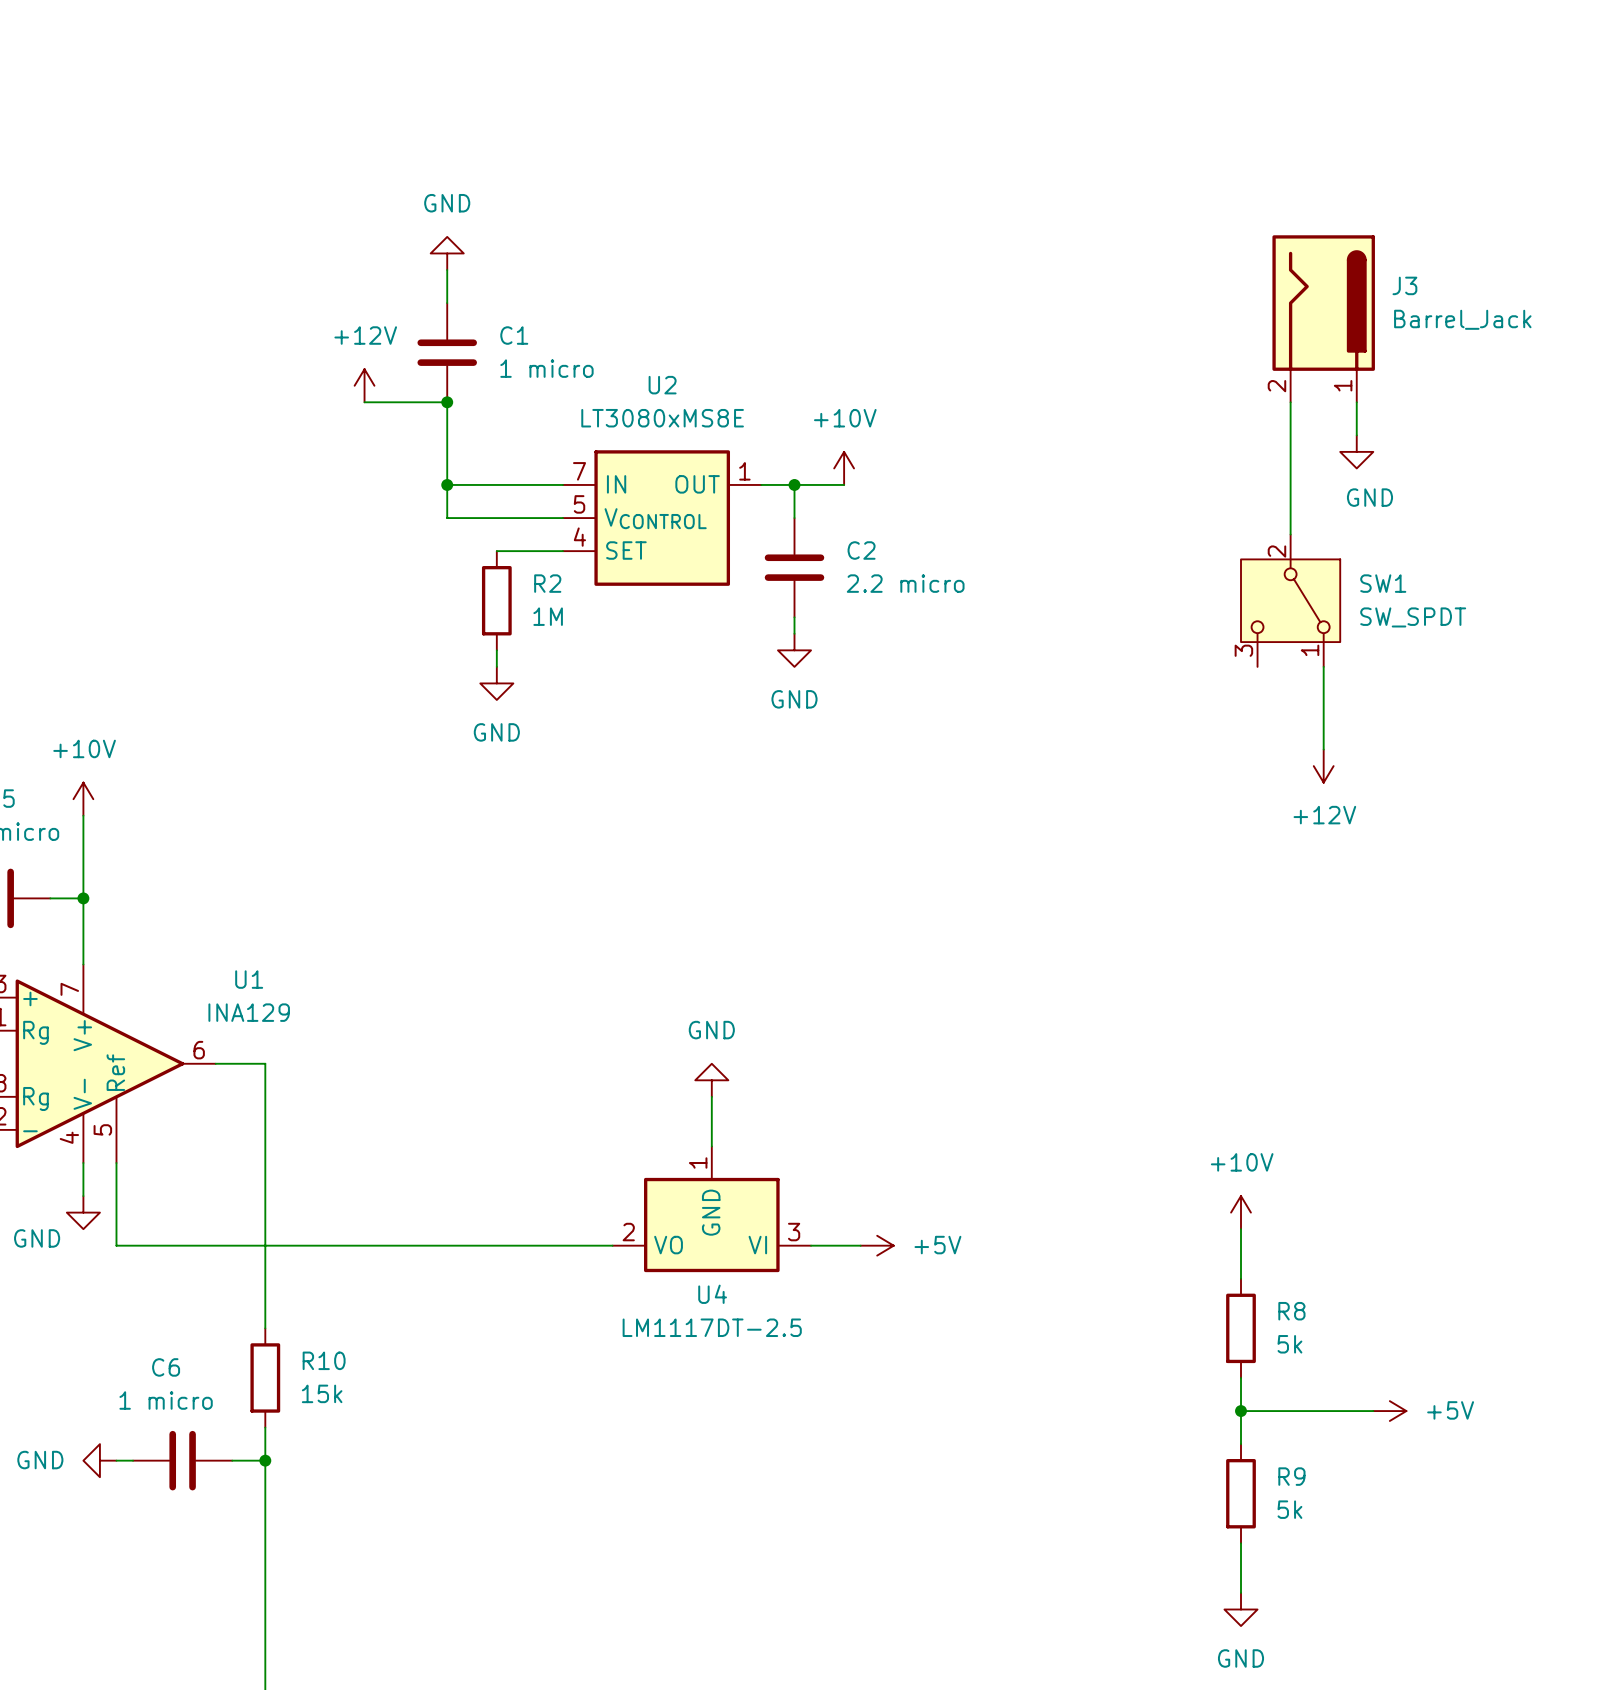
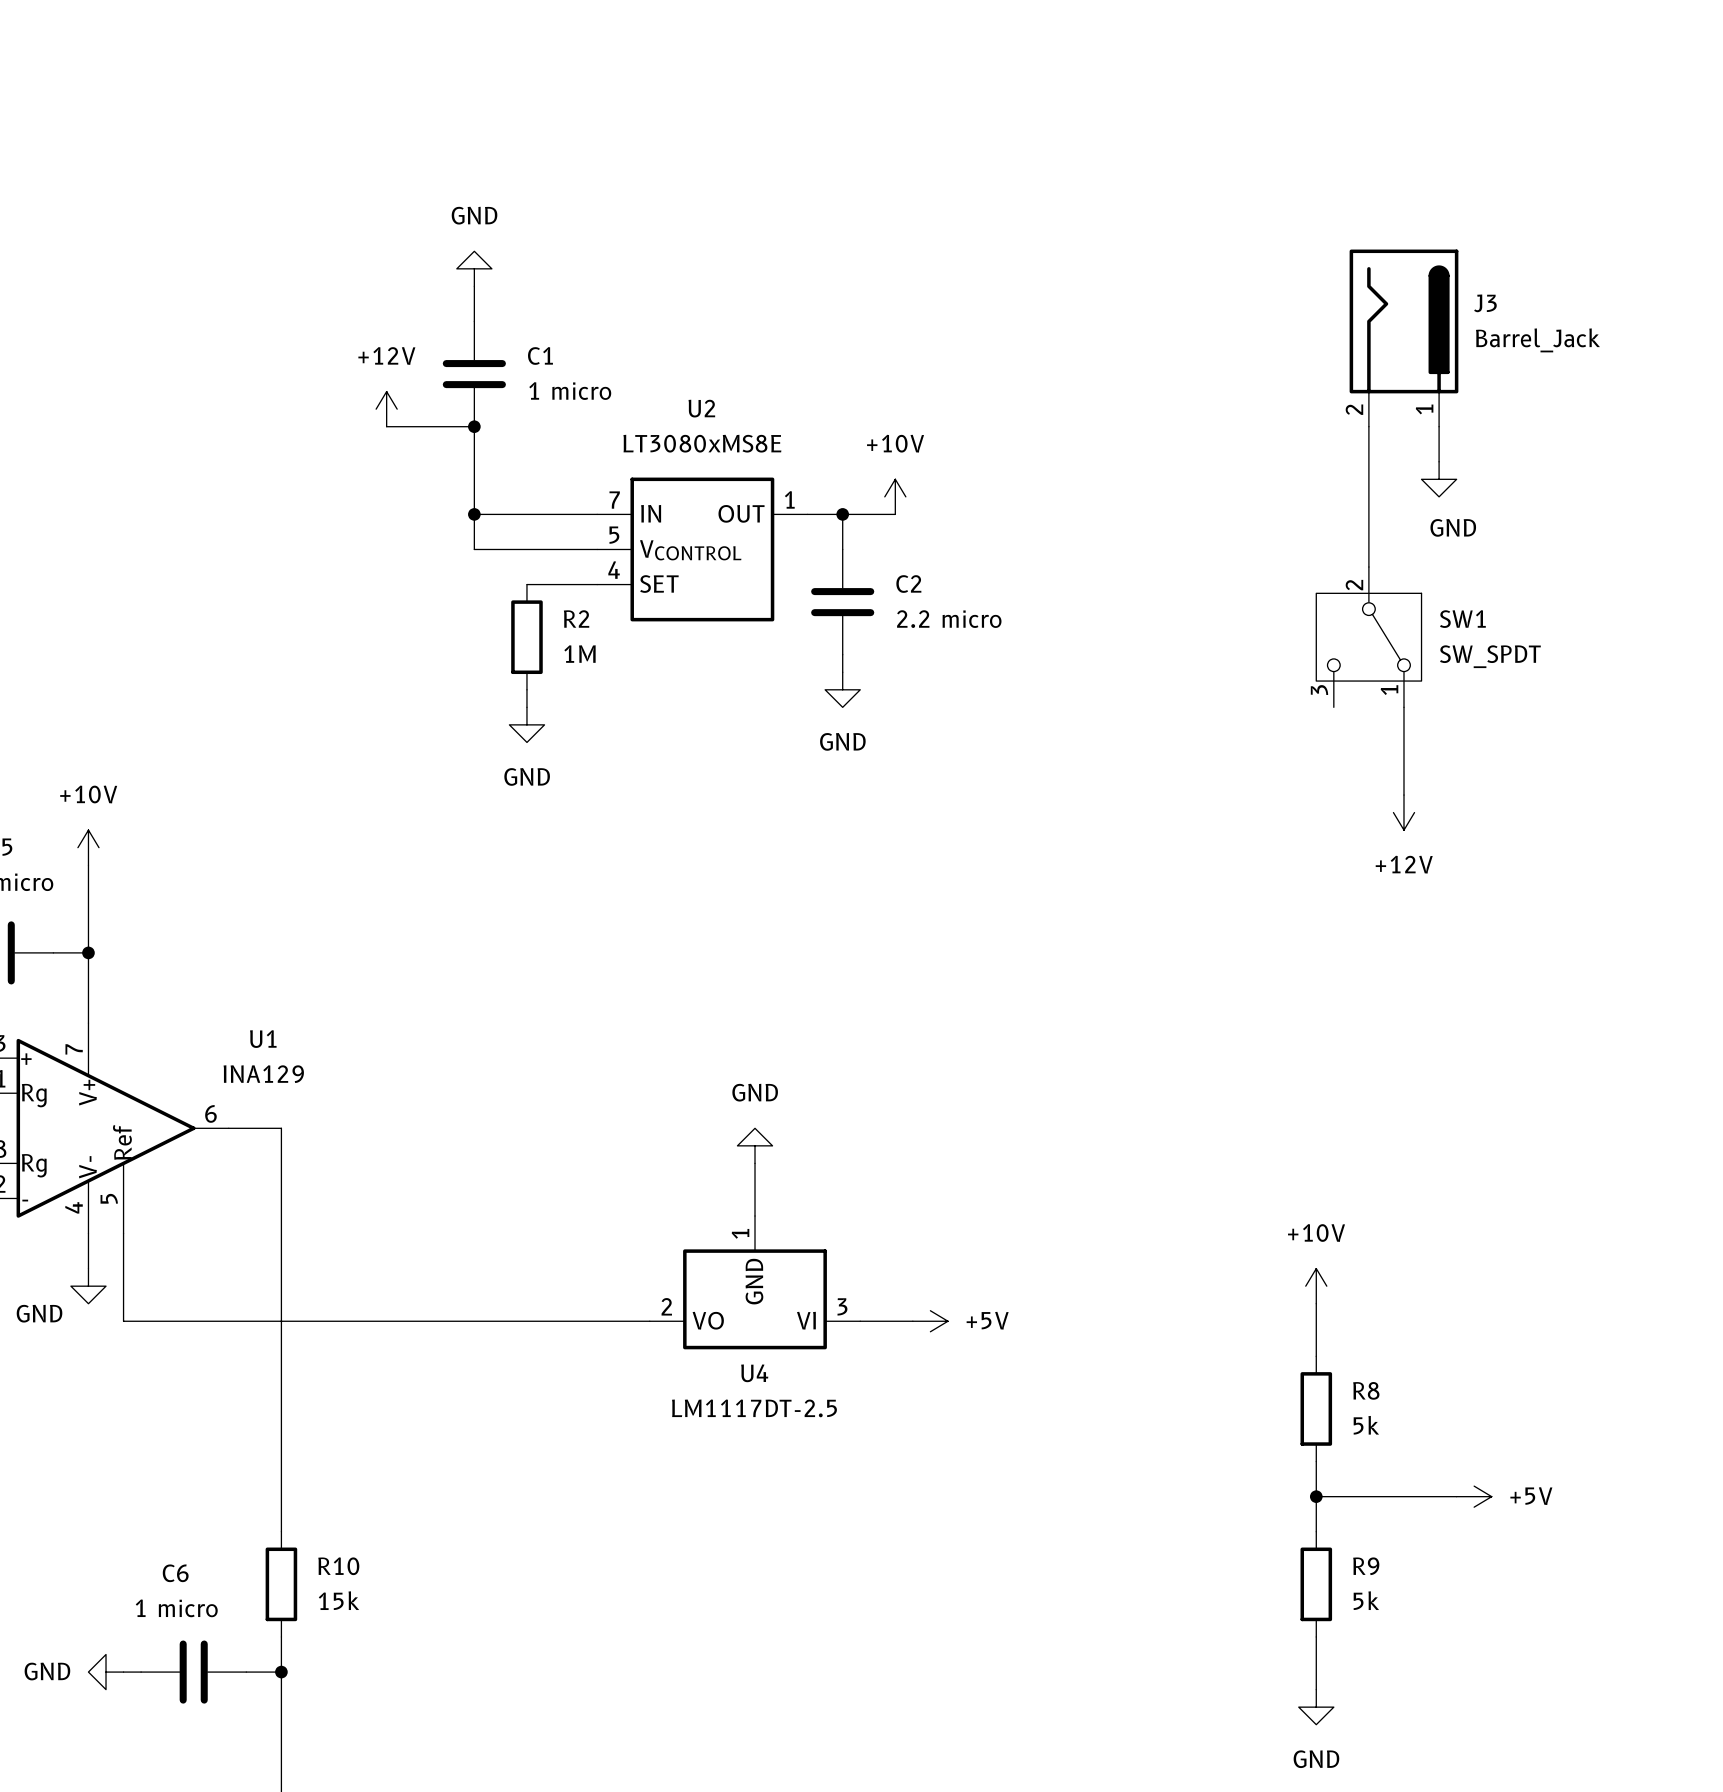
R10 position: (265, 1377) -> (281, 1584)
wire: (265, 1444) (265, 1543) -> (281, 1408) (281, 1514)
power symbol position: GND (99, 1460) -> GND (106, 1672)
wire: (116, 1460) (133, 1460) -> (123, 1672) (141, 1672)
C6 position: (182, 1460) -> (193, 1672)
wire: (232, 1460) (265, 1460) -> (246, 1672) (281, 1672)
junction: (265, 1460) -> none
junction: none -> (281, 1672)

